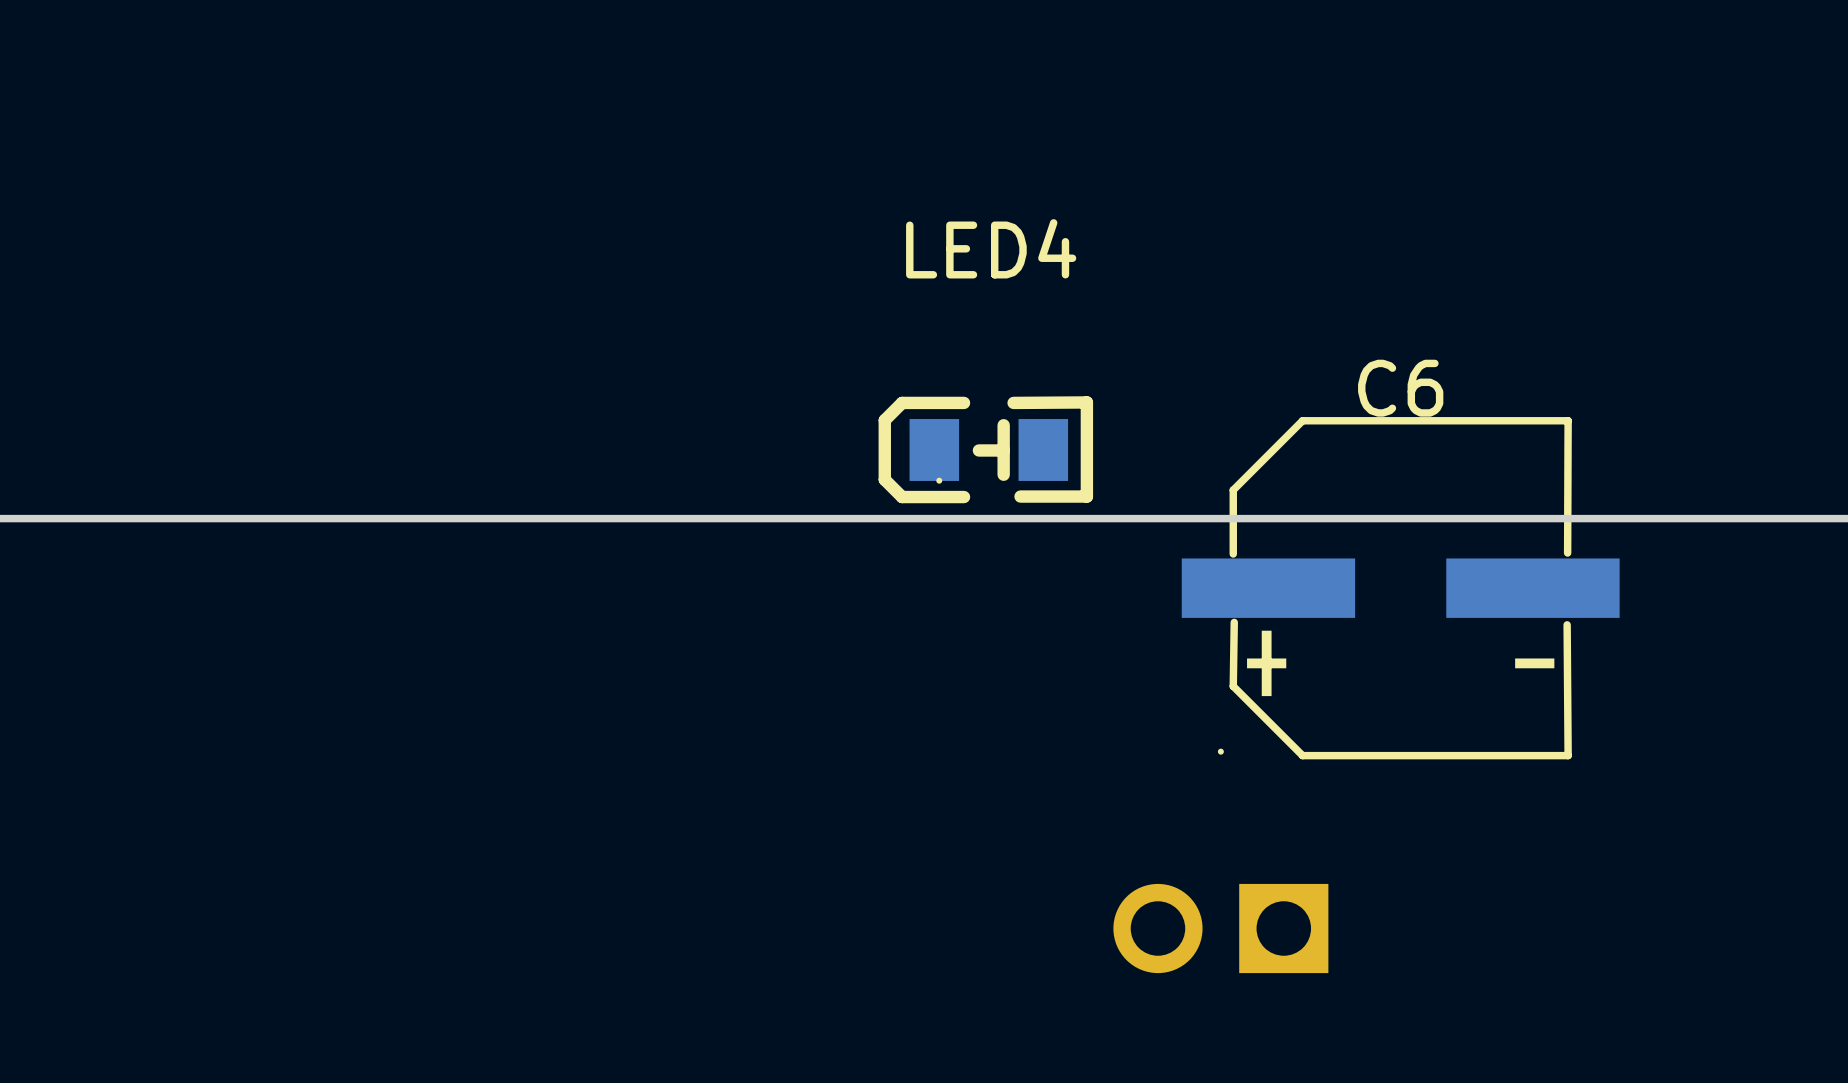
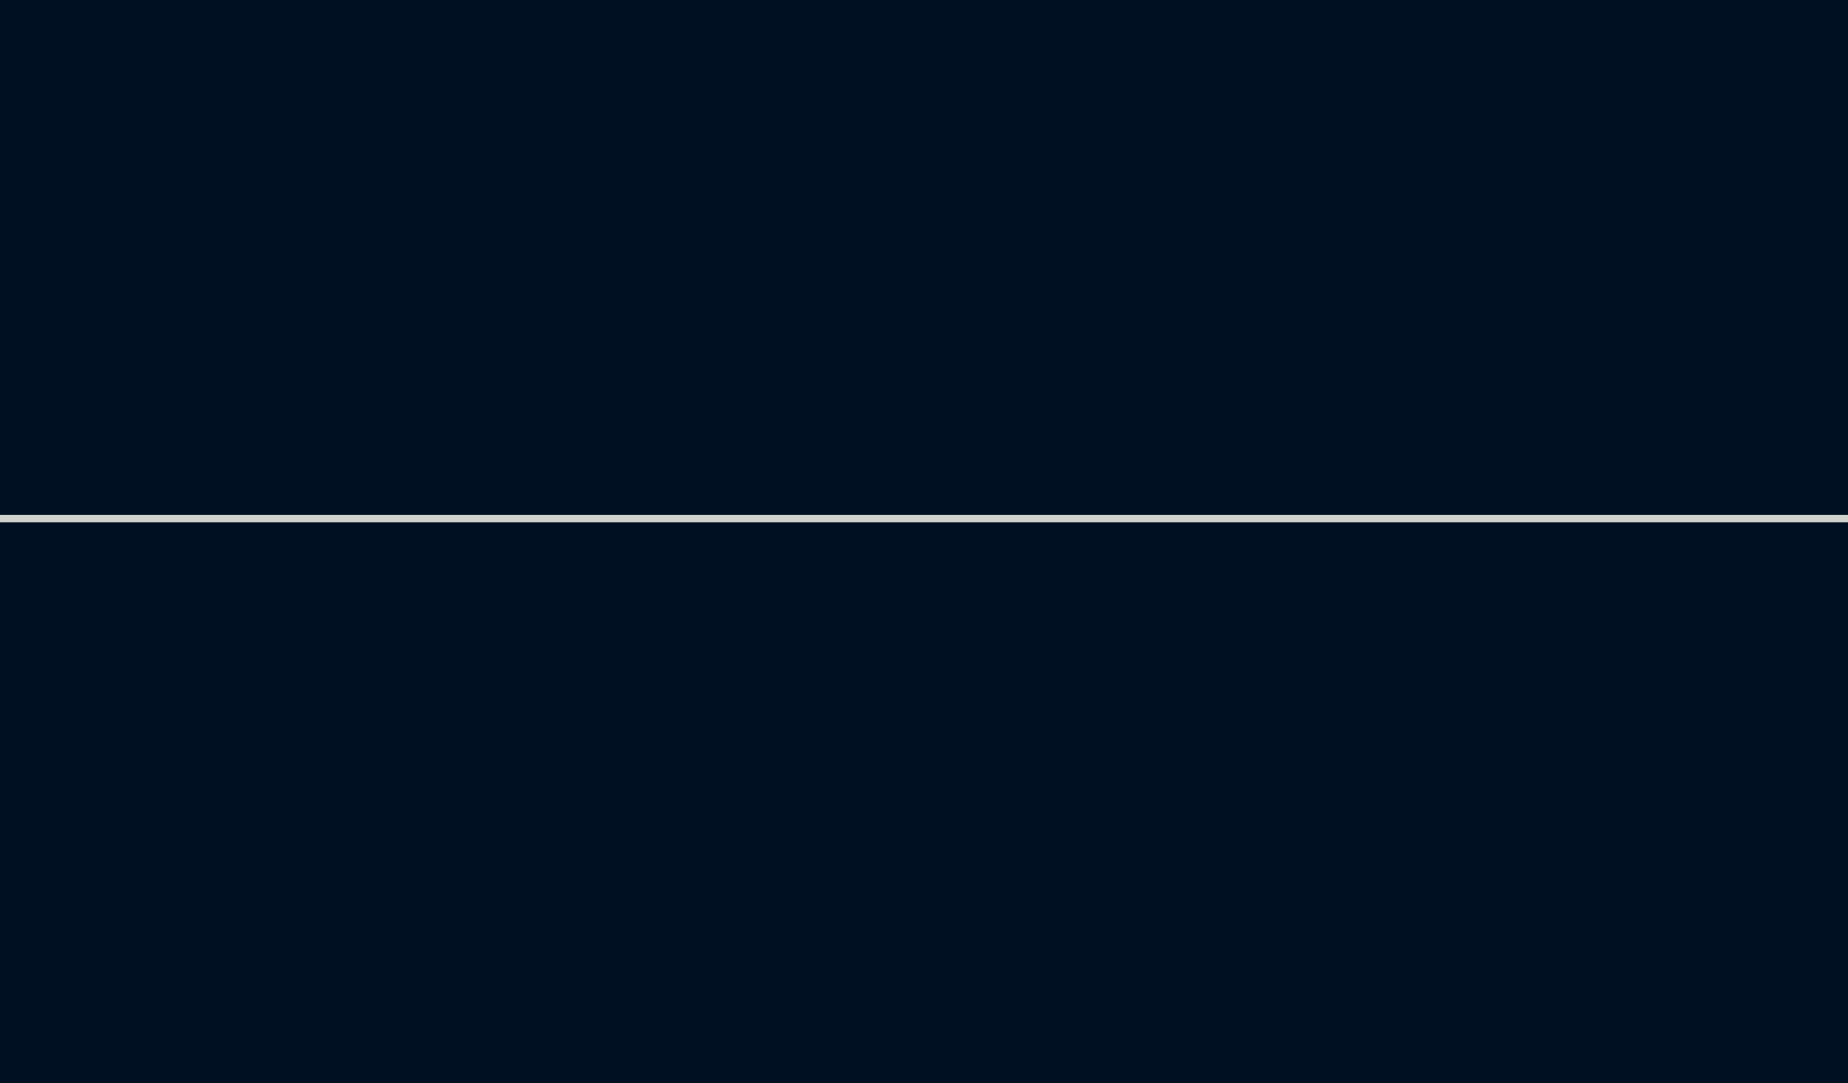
LED4: (985, 449) -> none
C6: (1400, 588) -> none
part: (1220, 928) -> none

